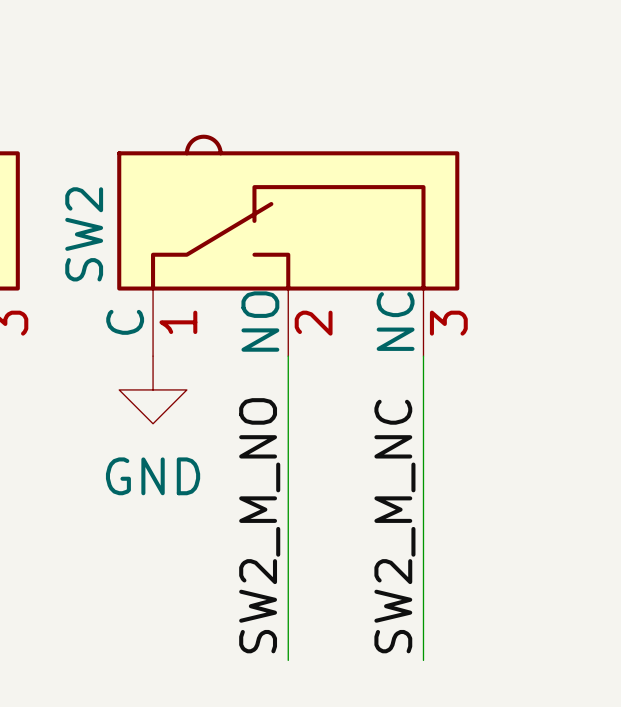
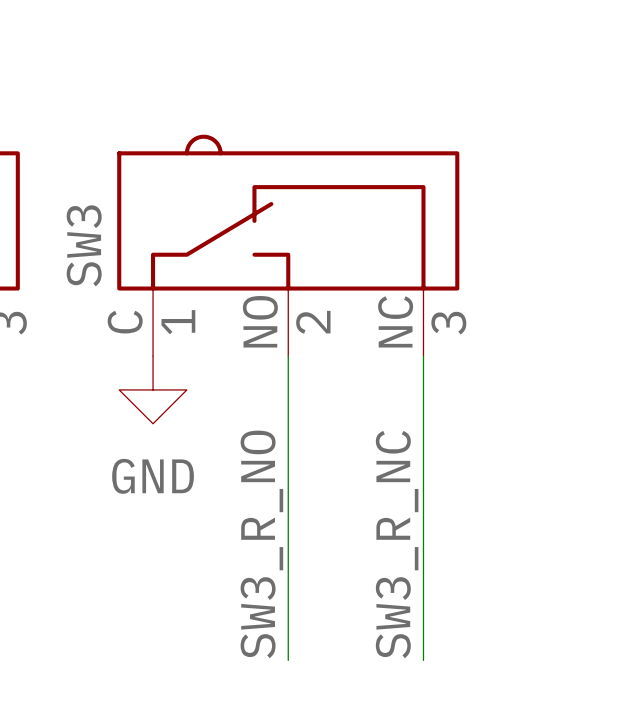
SW2 name: SW2 (84, 234) -> SW3 (84, 245)
label: SW2_M_NO (259, 525) -> SW3_R_NO (261, 544)
label: SW2_M_NC (394, 526) -> SW3_R_NC (397, 544)

